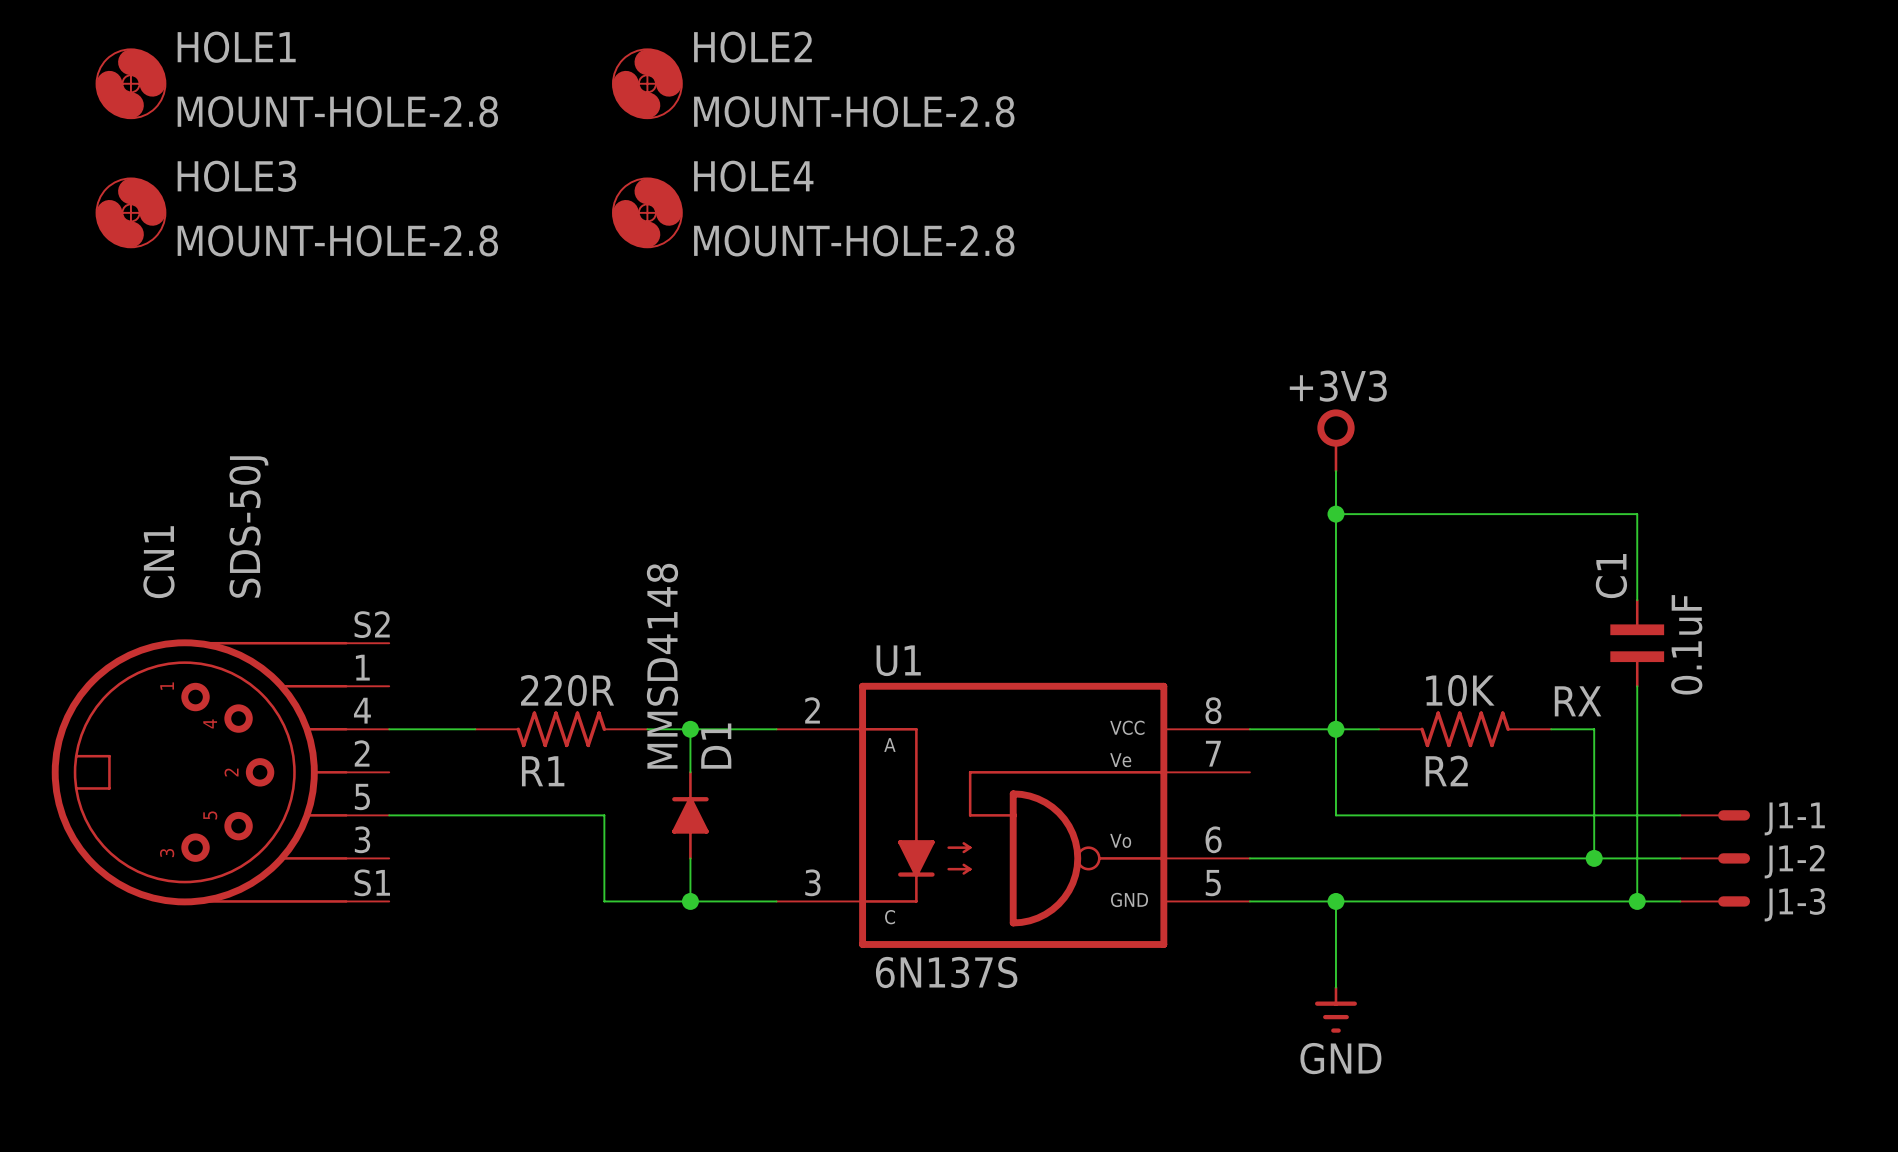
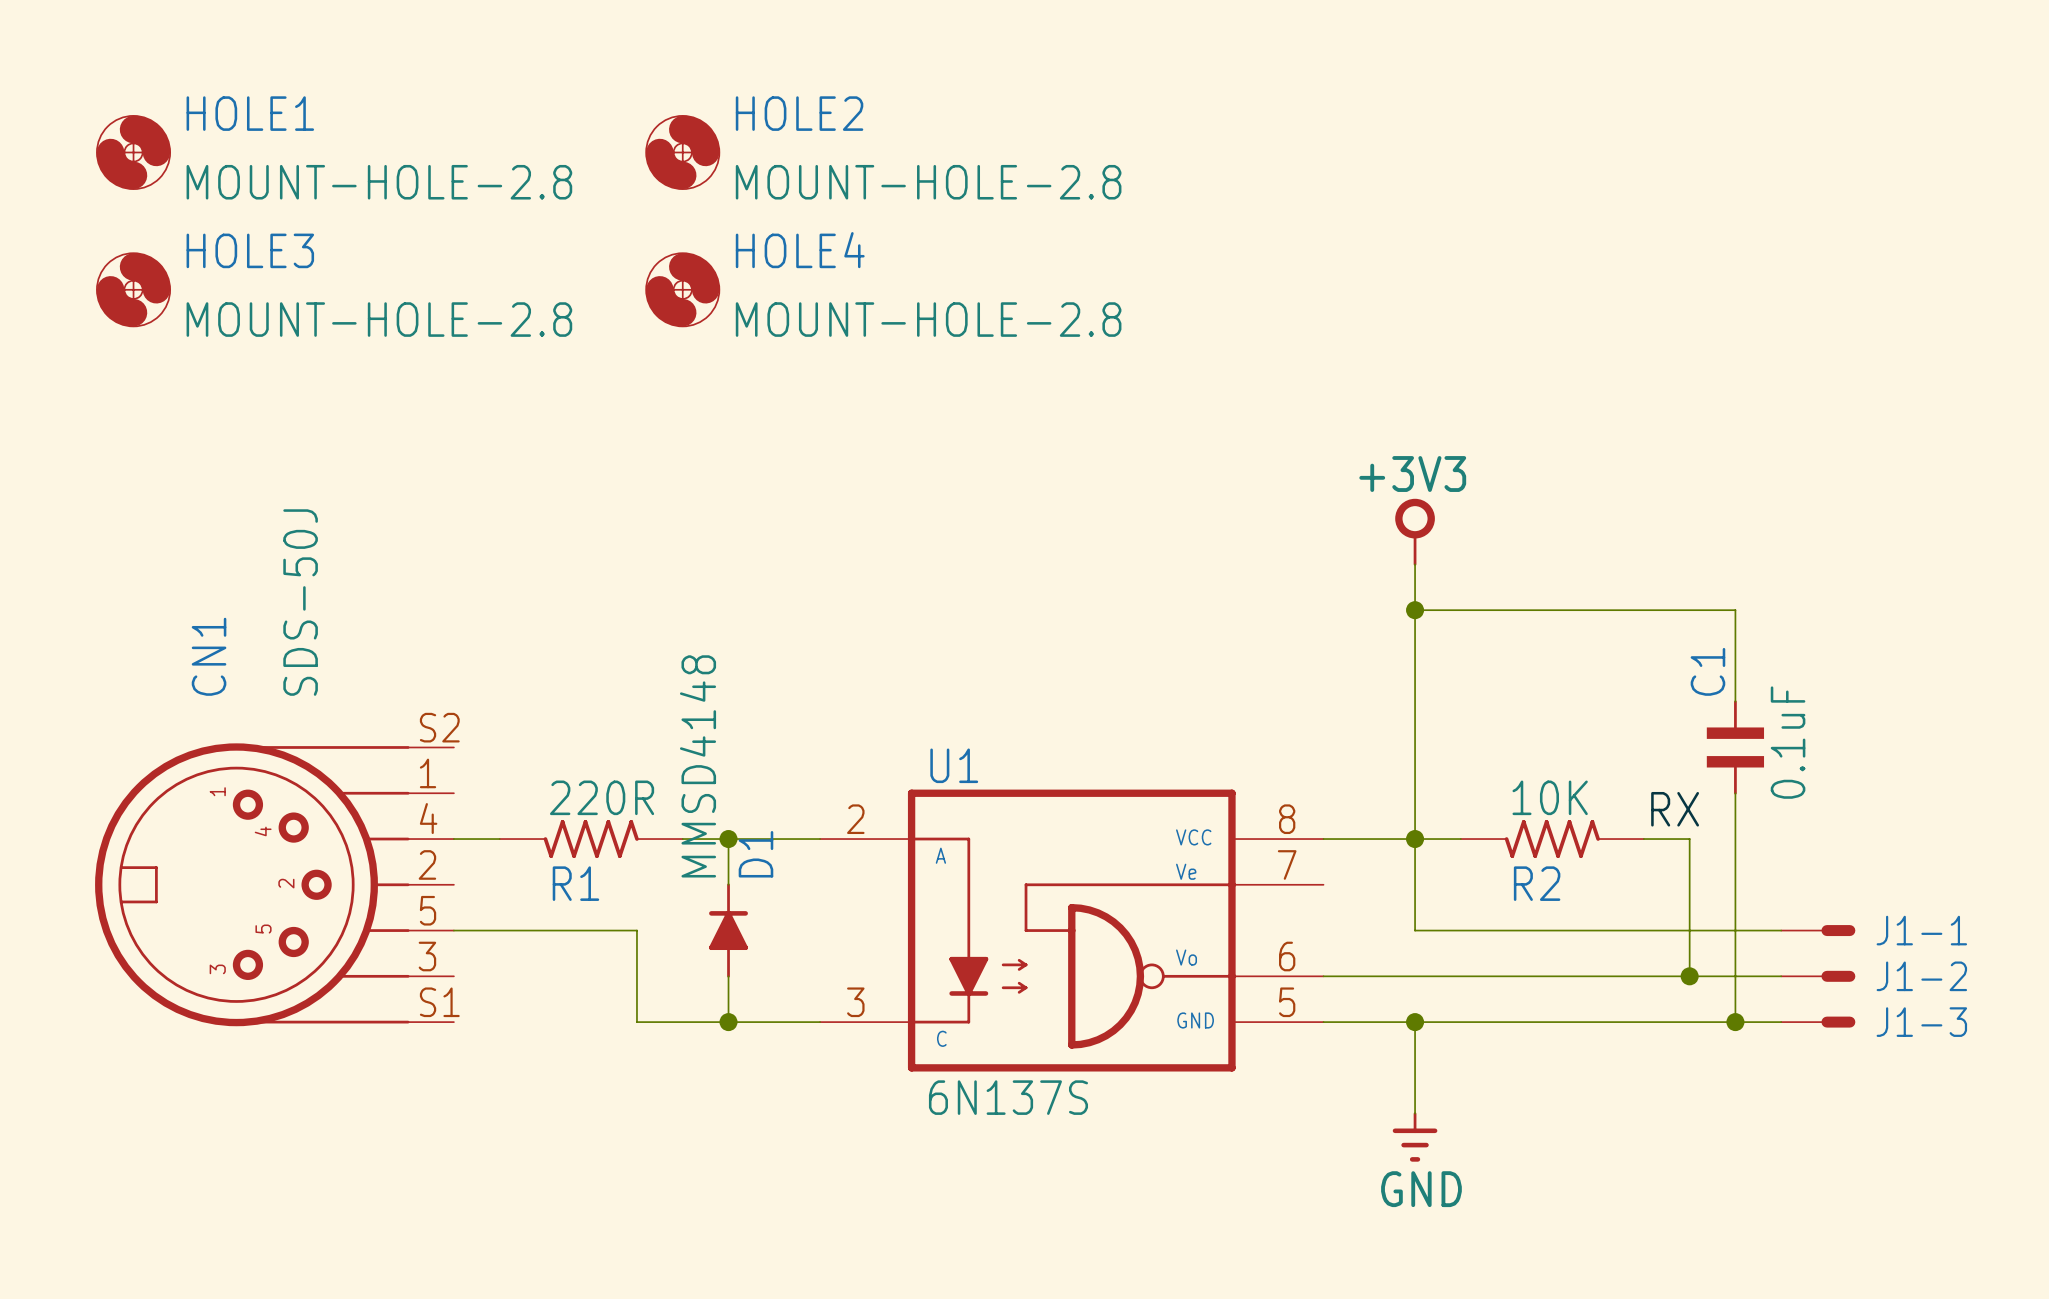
CN1 position: (220, 772) -> (274, 884)

